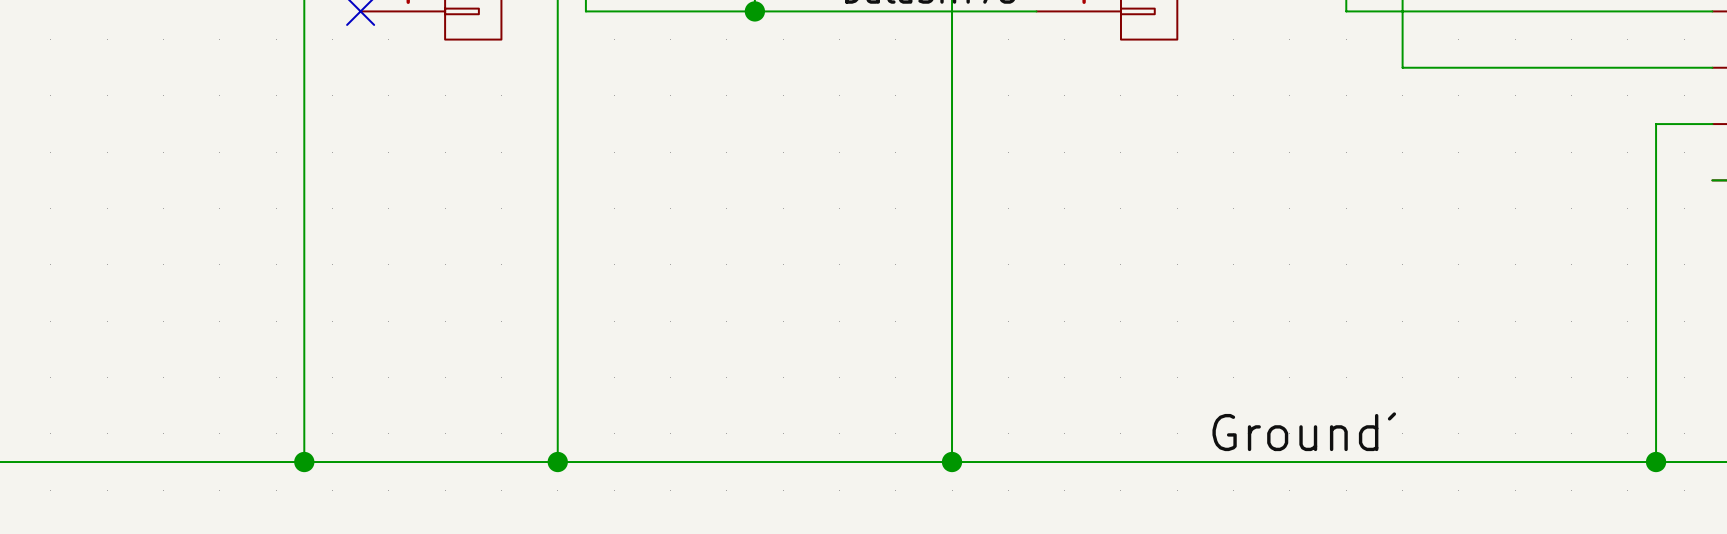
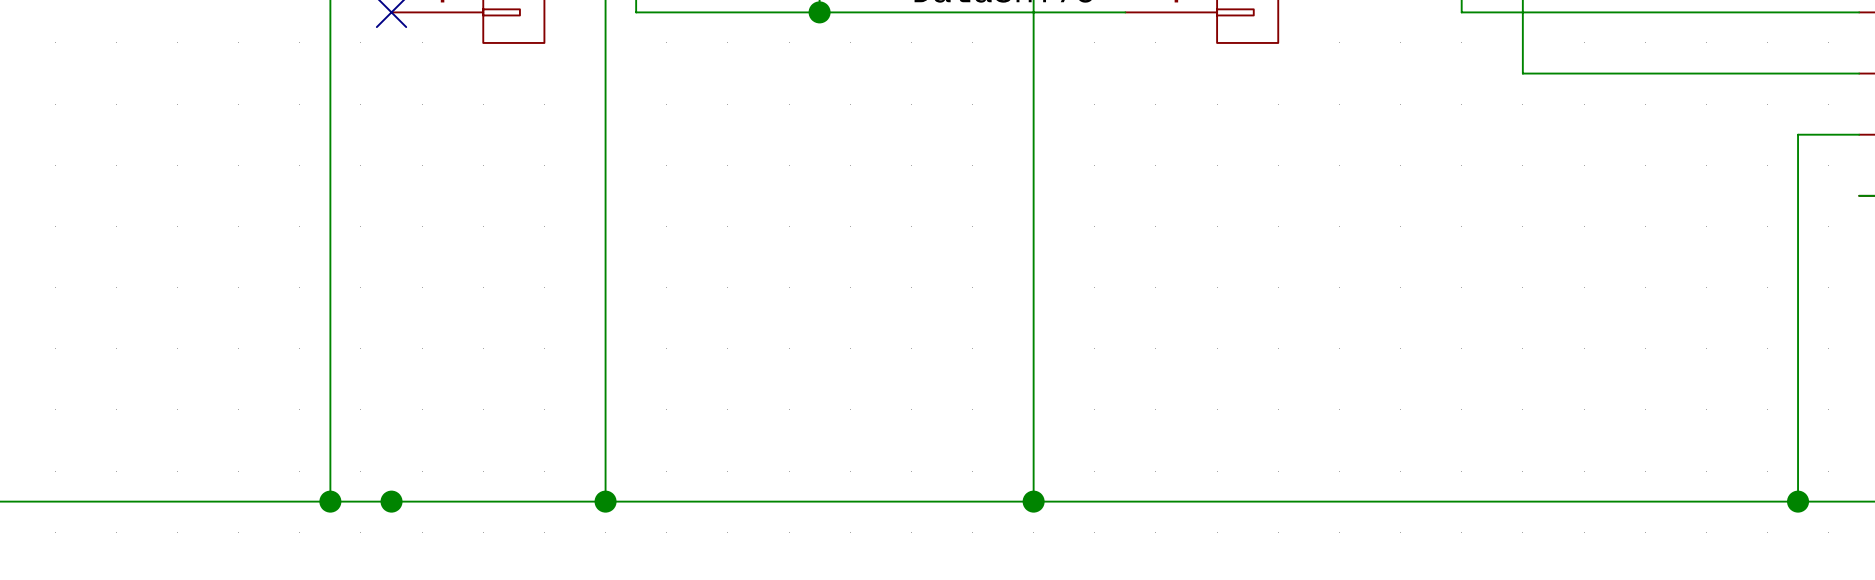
label: Ground´ (1304, 431) -> none
junction: none -> (391, 501)

